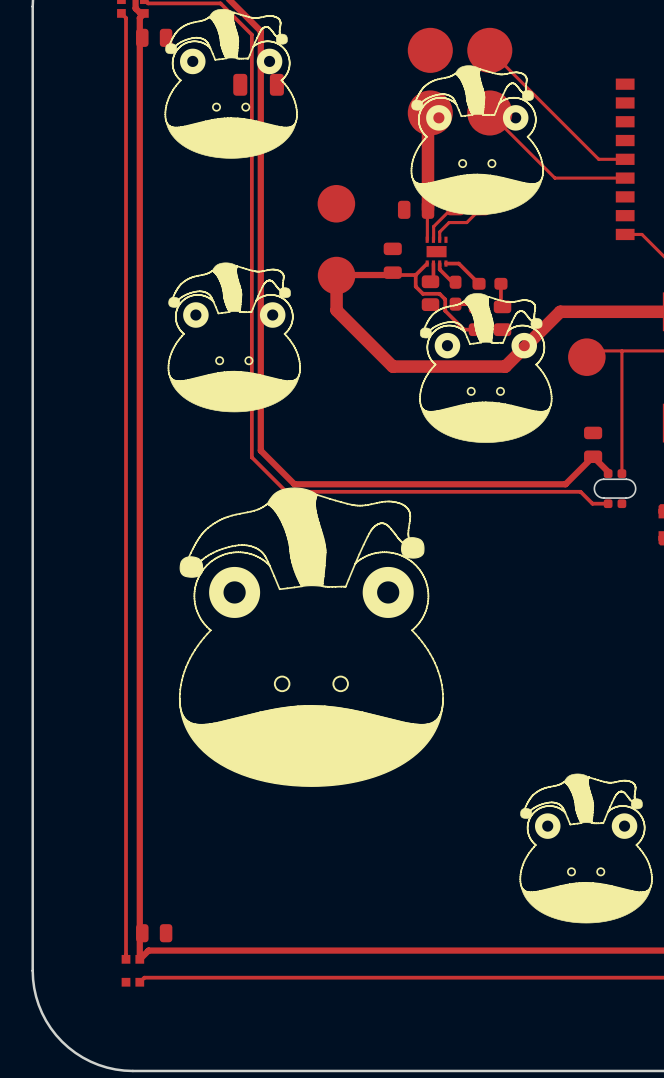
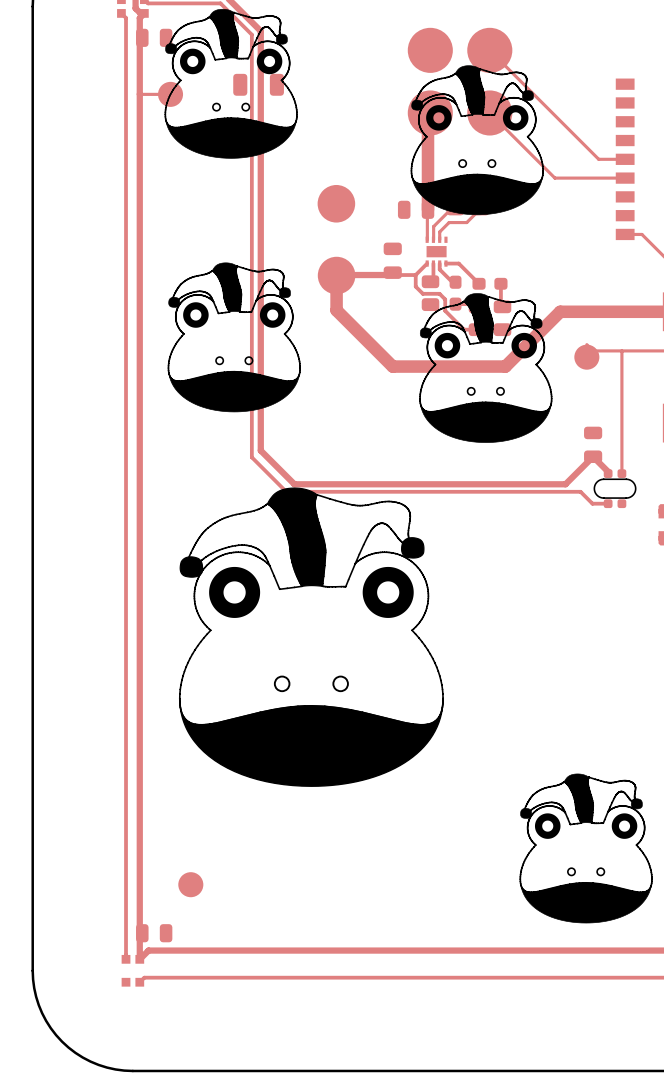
top track: none -> (139, 94) (170, 94)
part: none -> (170, 94)
part footprint: [568, 338, 606, 376] -> [574, 344, 600, 370]
part: none -> (190, 884)

